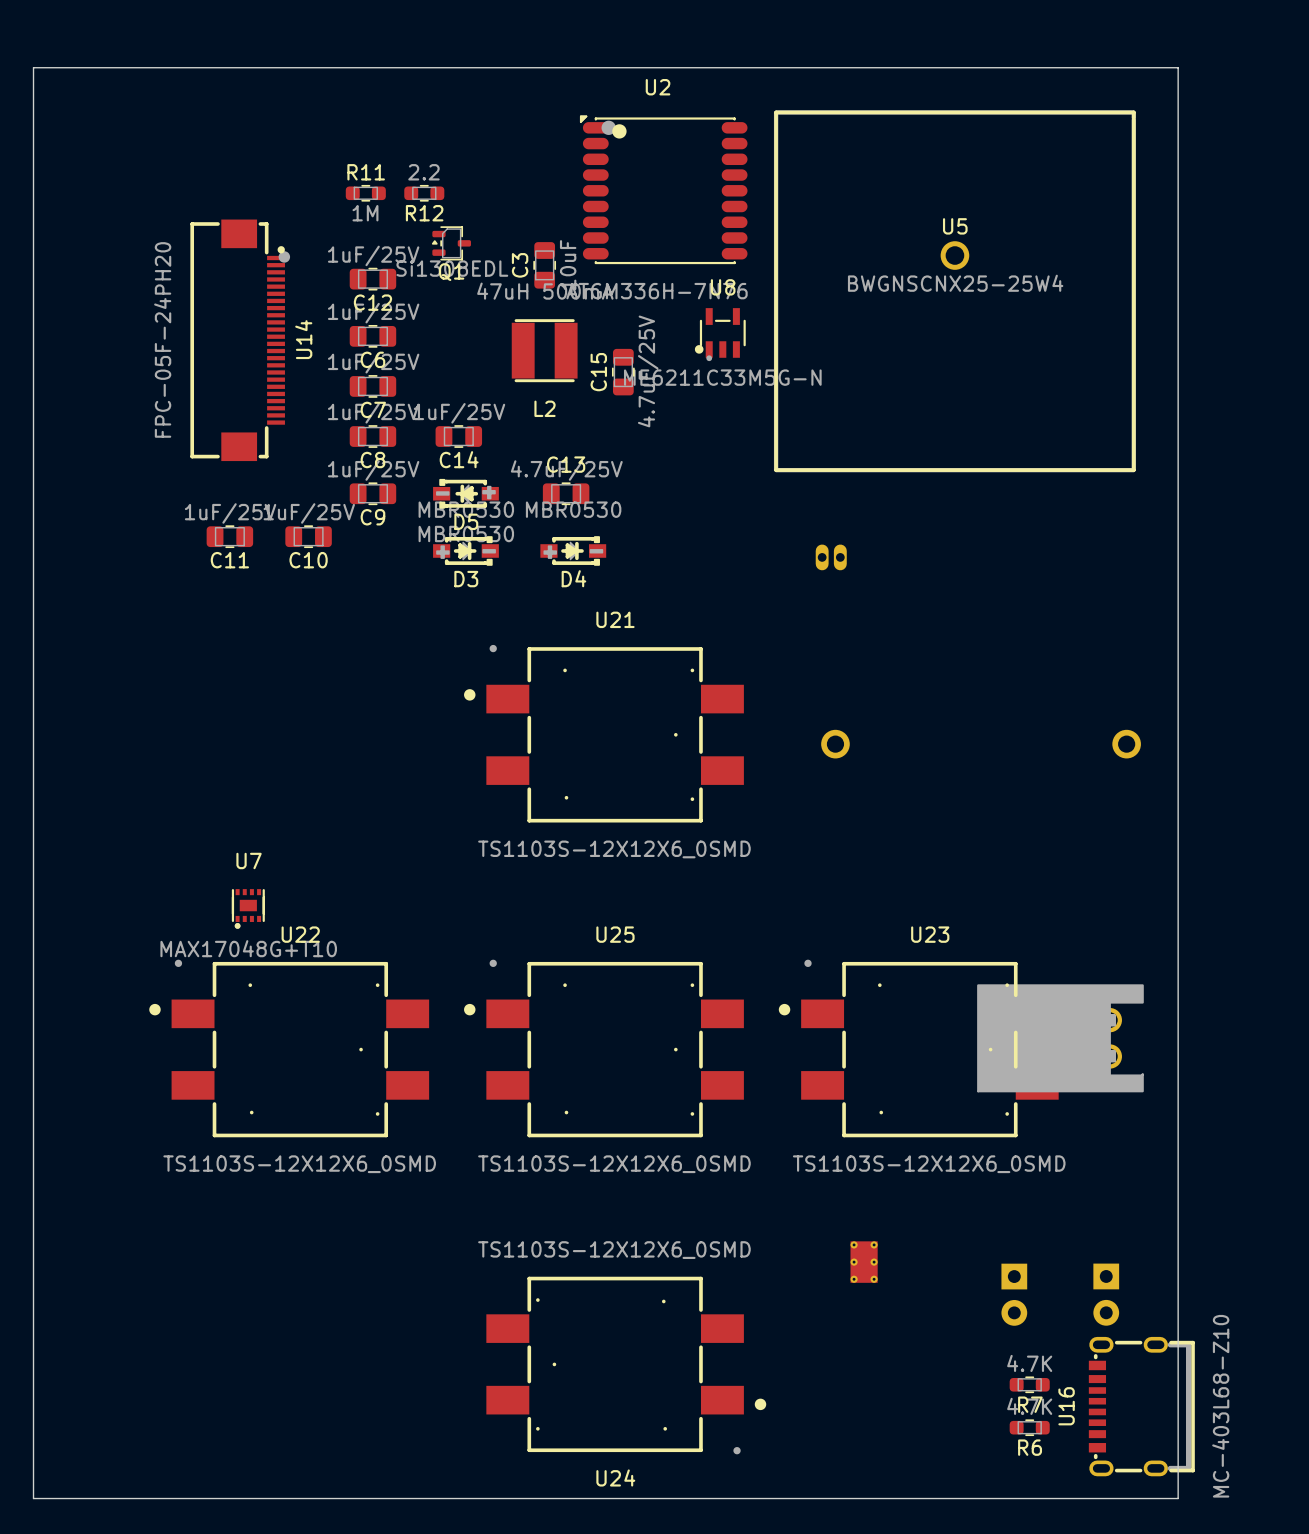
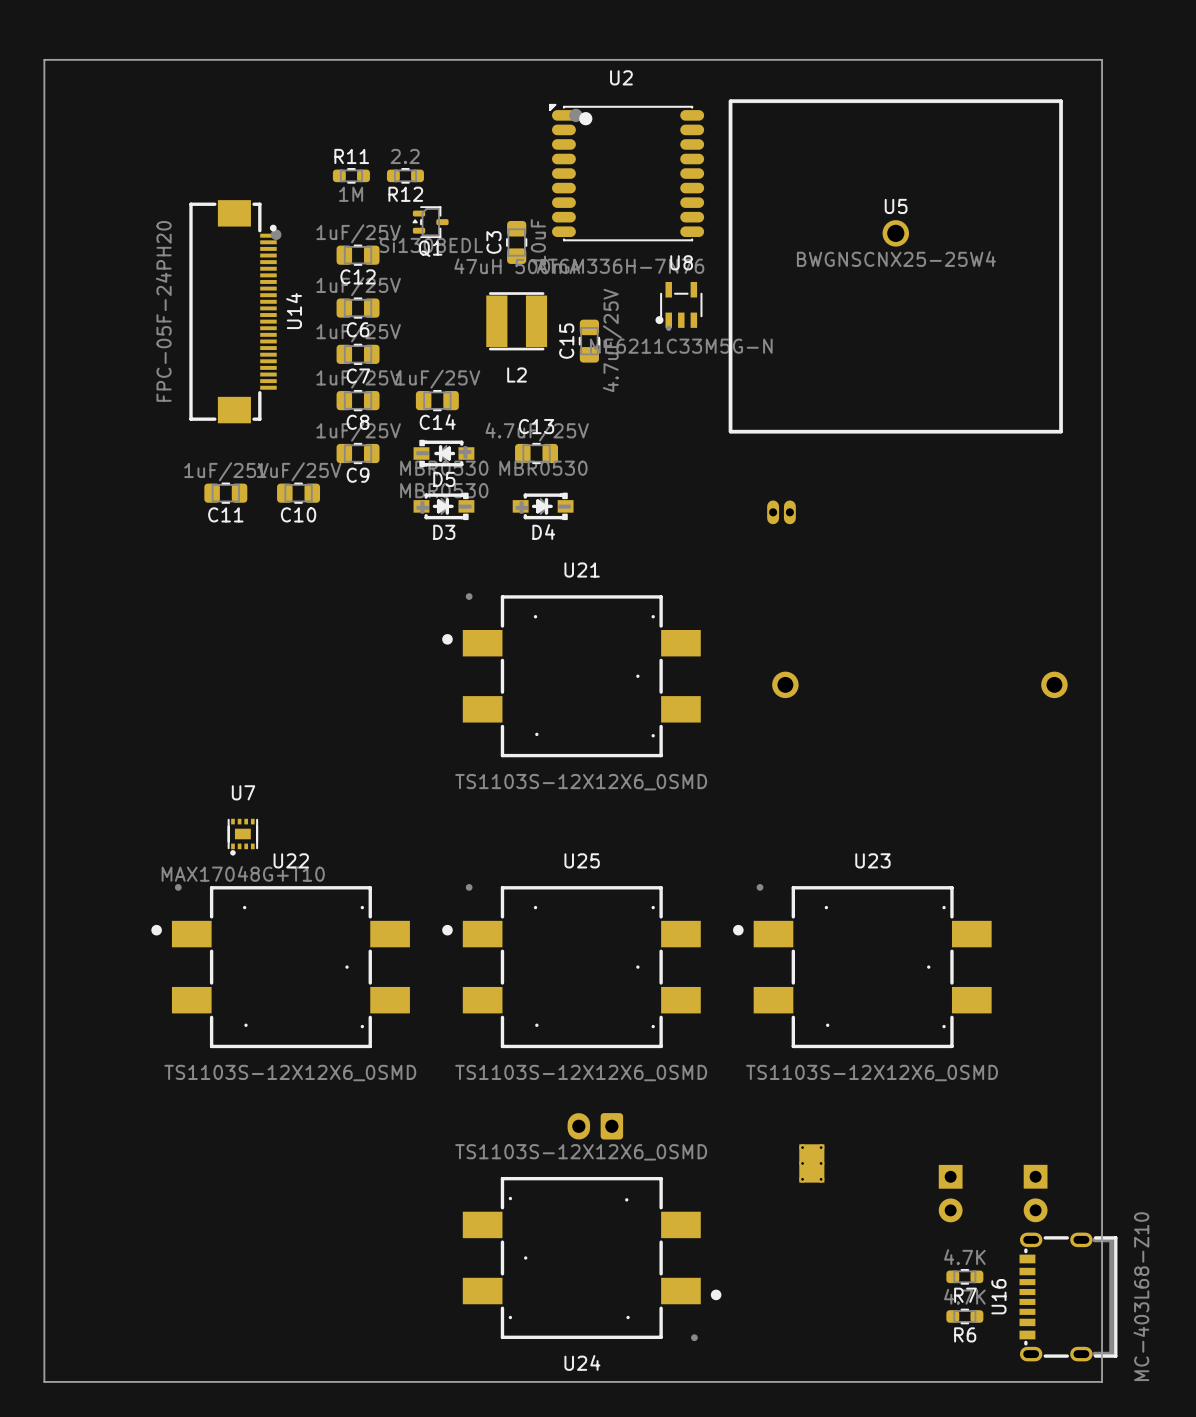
part: (1060, 1038) -> none
part: none -> (595, 1126)

